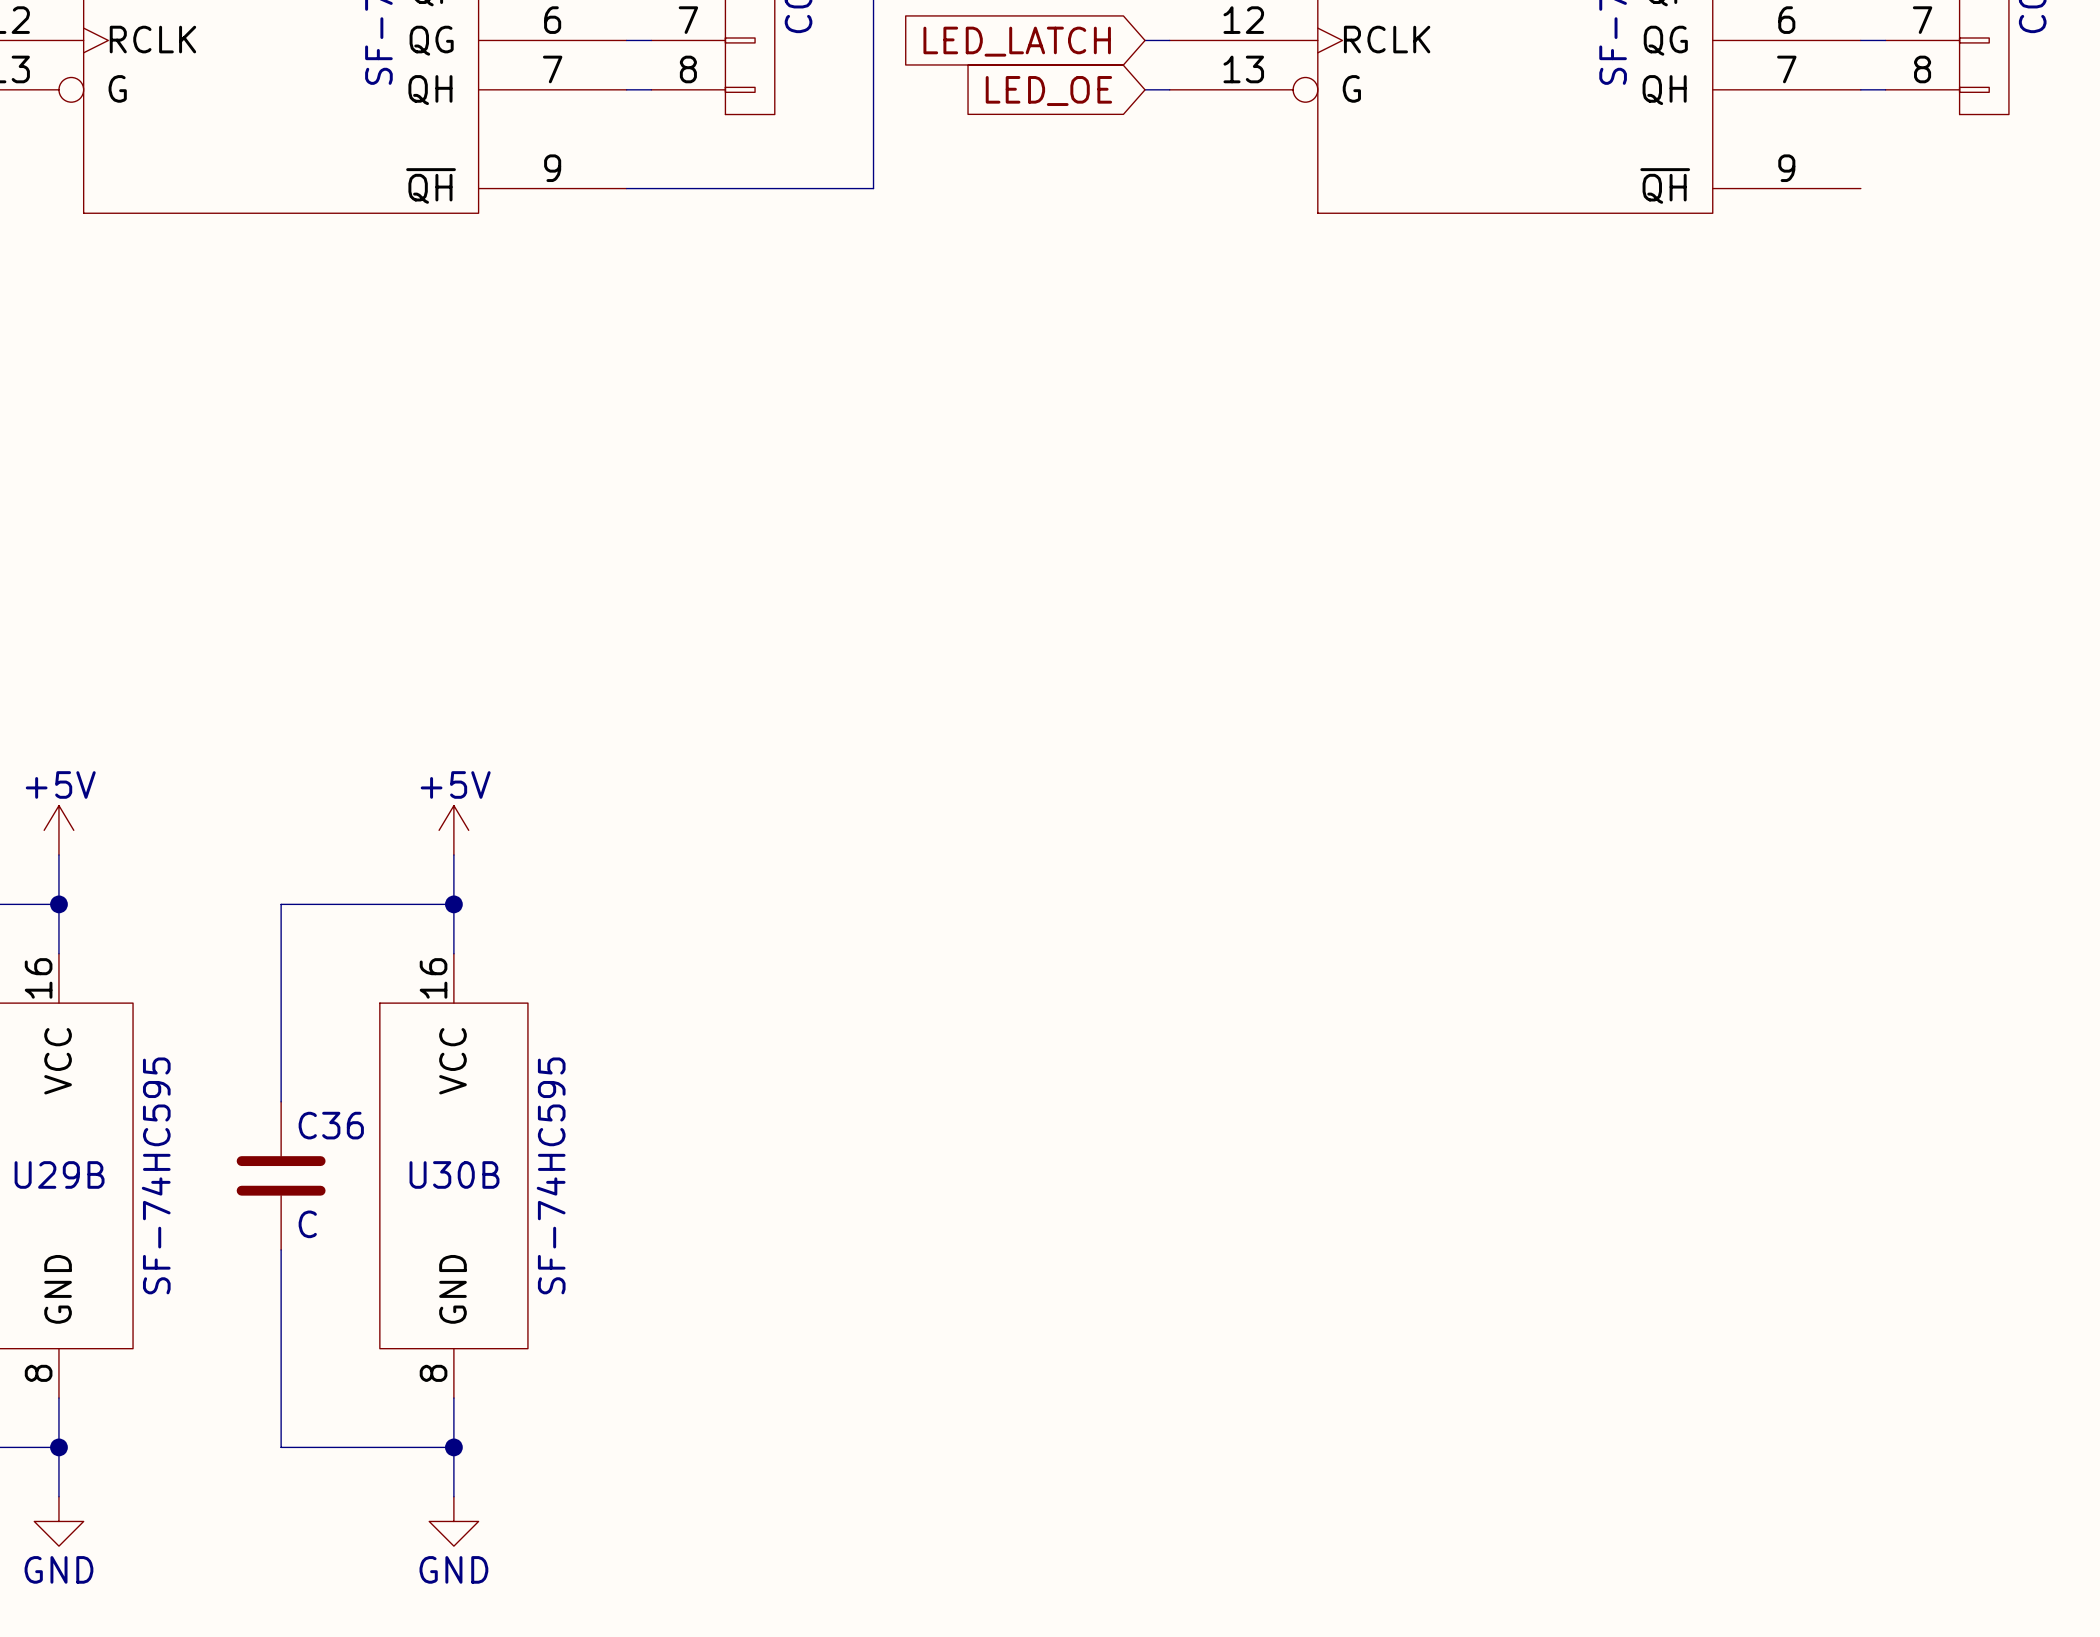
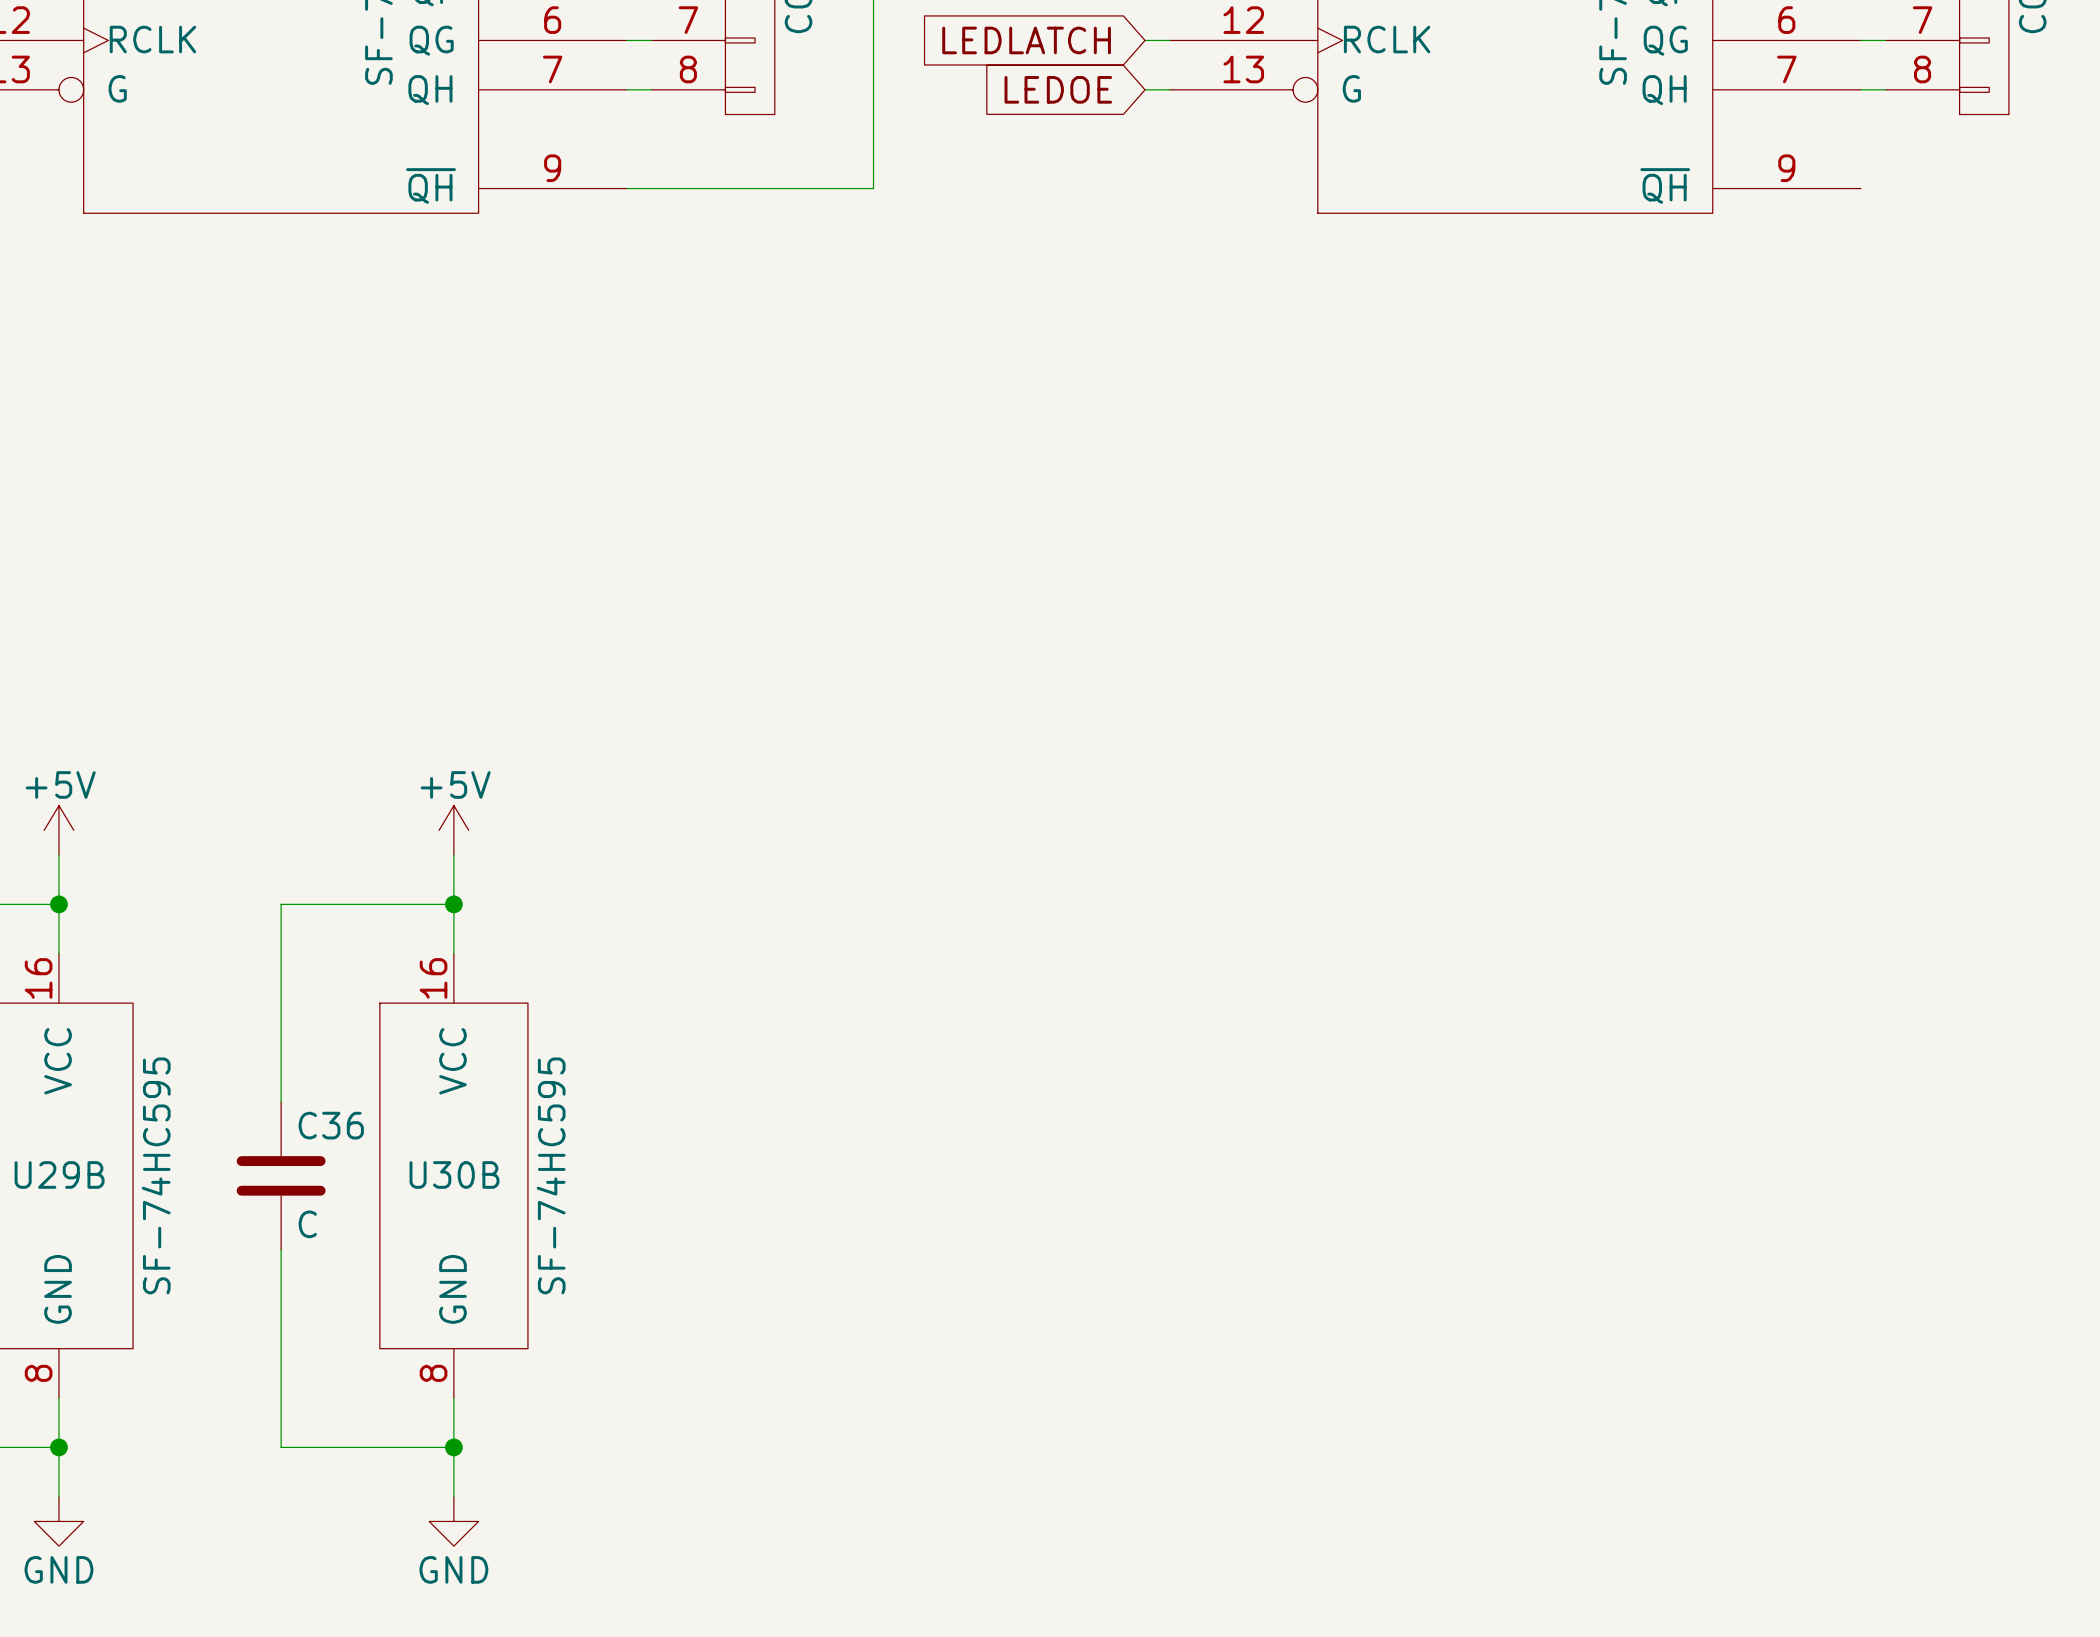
global label: LED_LATCH (1017, 41) -> LEDLATCH (1026, 40)
global label: LED_OE (1048, 91) -> LEDOE (1058, 89)

